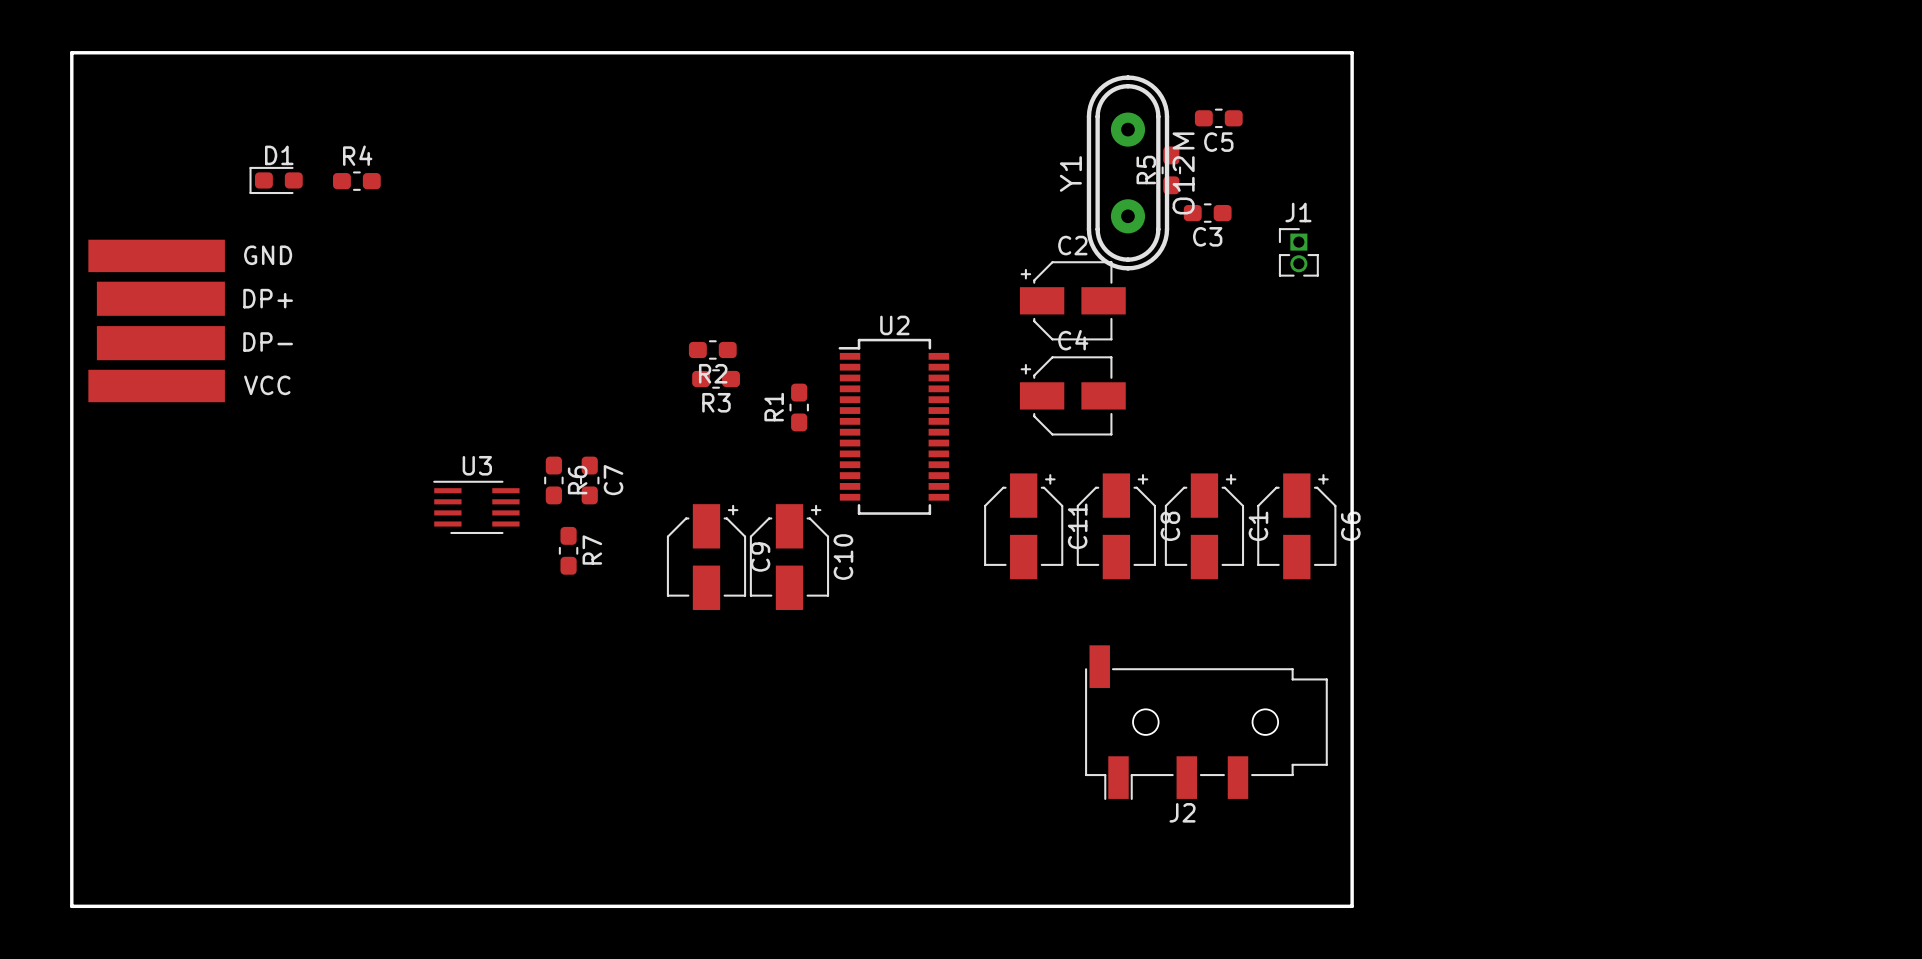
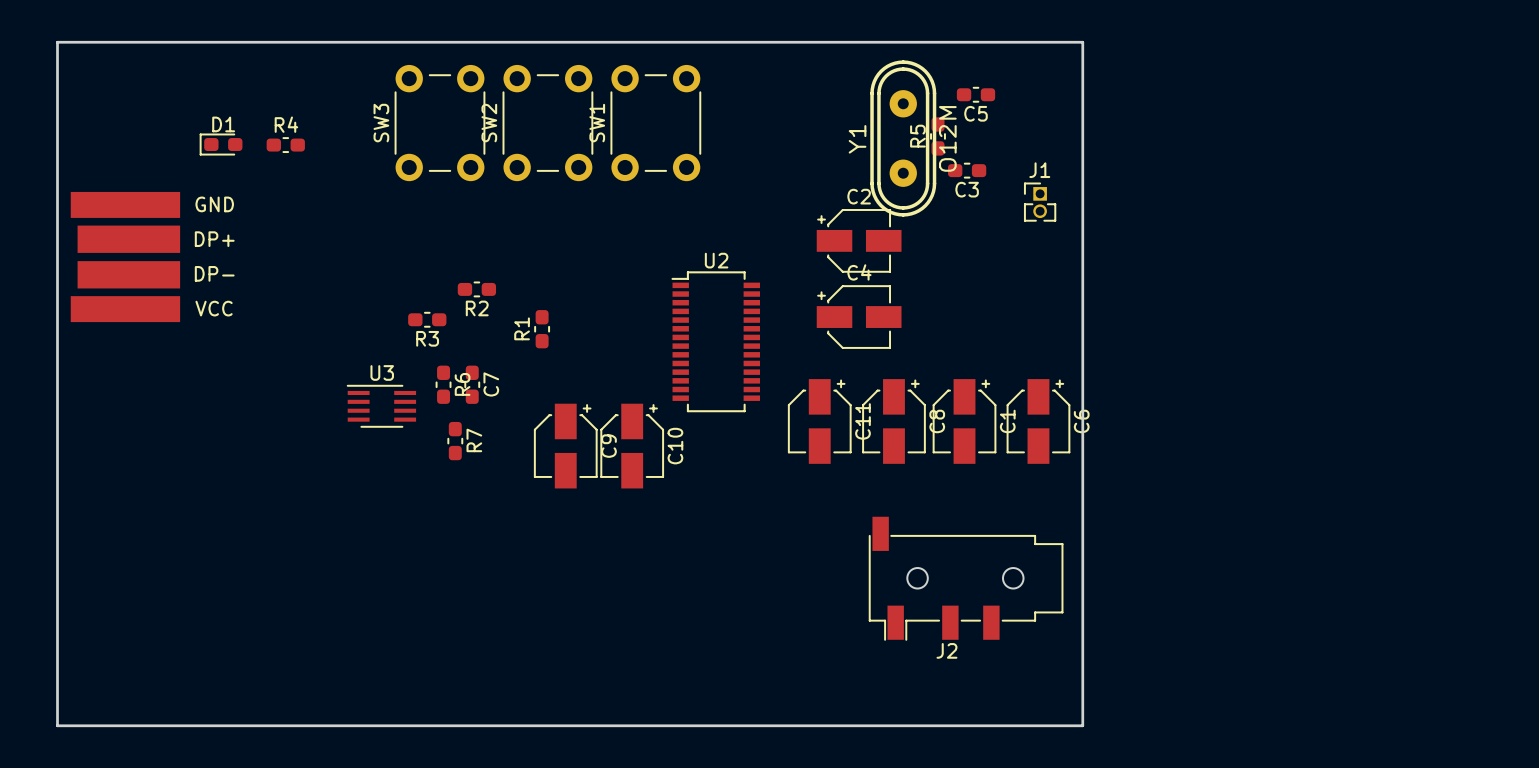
SW3: none -> (439, 123)
SW2: none -> (547, 123)
SW1: none -> (655, 123)
R2 position: (712, 349) -> (476, 289)
R3 position: (716, 379) -> (427, 319)
R1 position: (799, 407) -> (542, 329)

